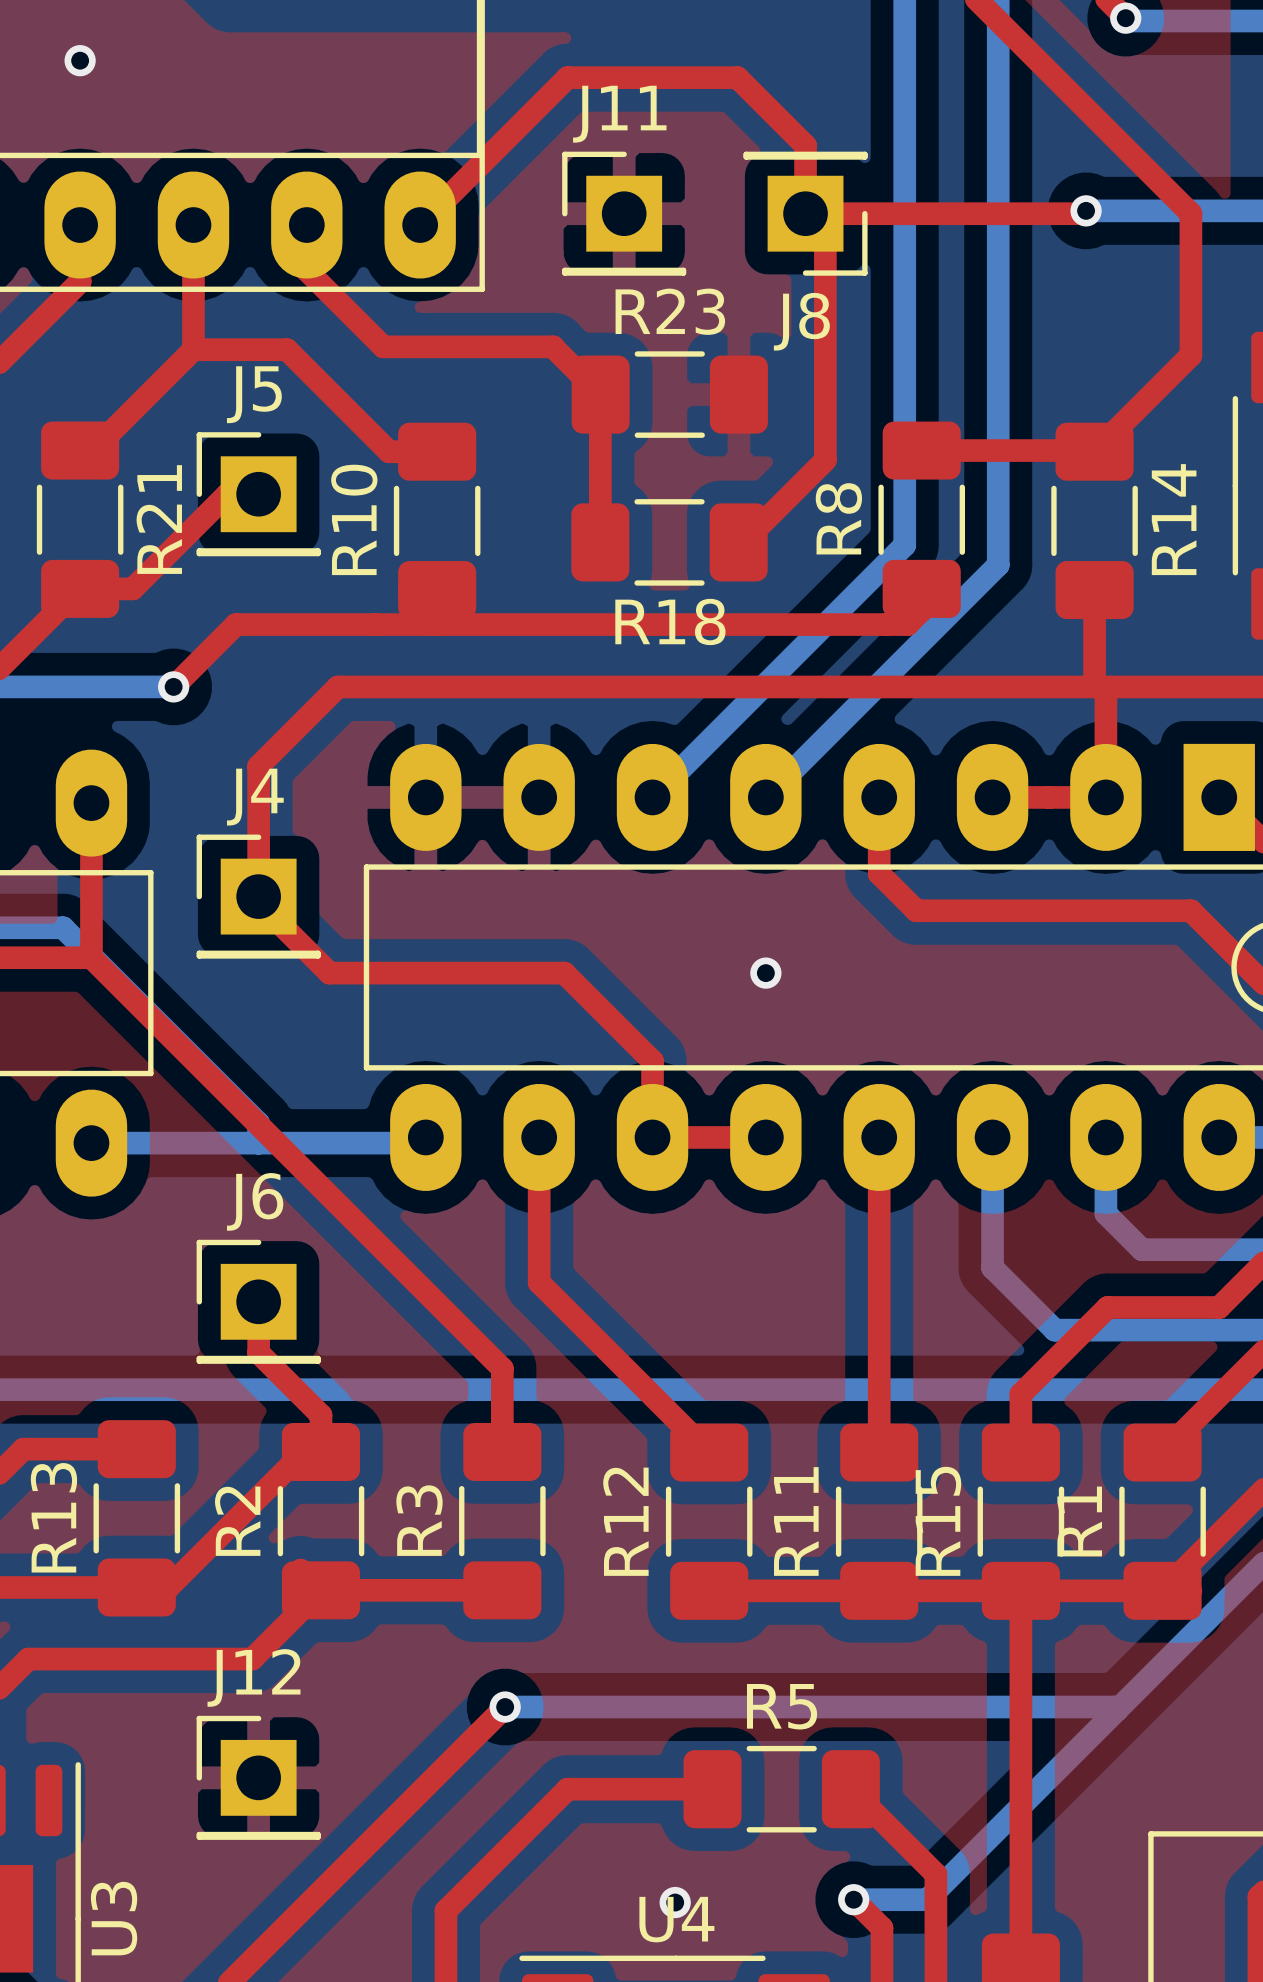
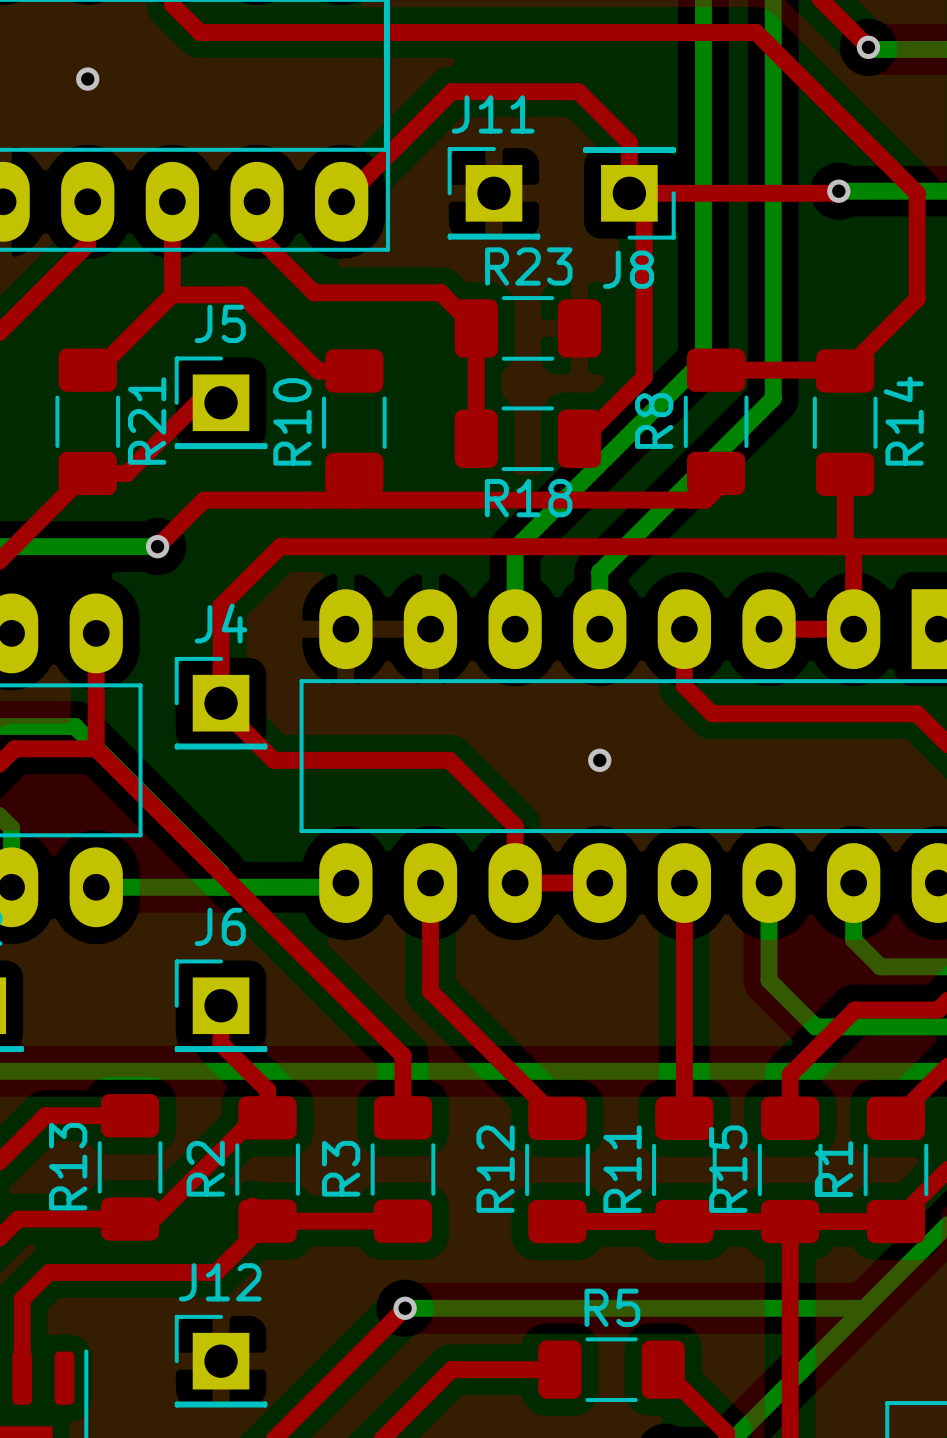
bottom track: (904, 437) (904, 545) (652, 797) -> (703, 360) (515, 548) (515, 629)
bottom track: (998, 488) (998, 565) (765, 797) -> (773, 398) (599, 572) (599, 629)

